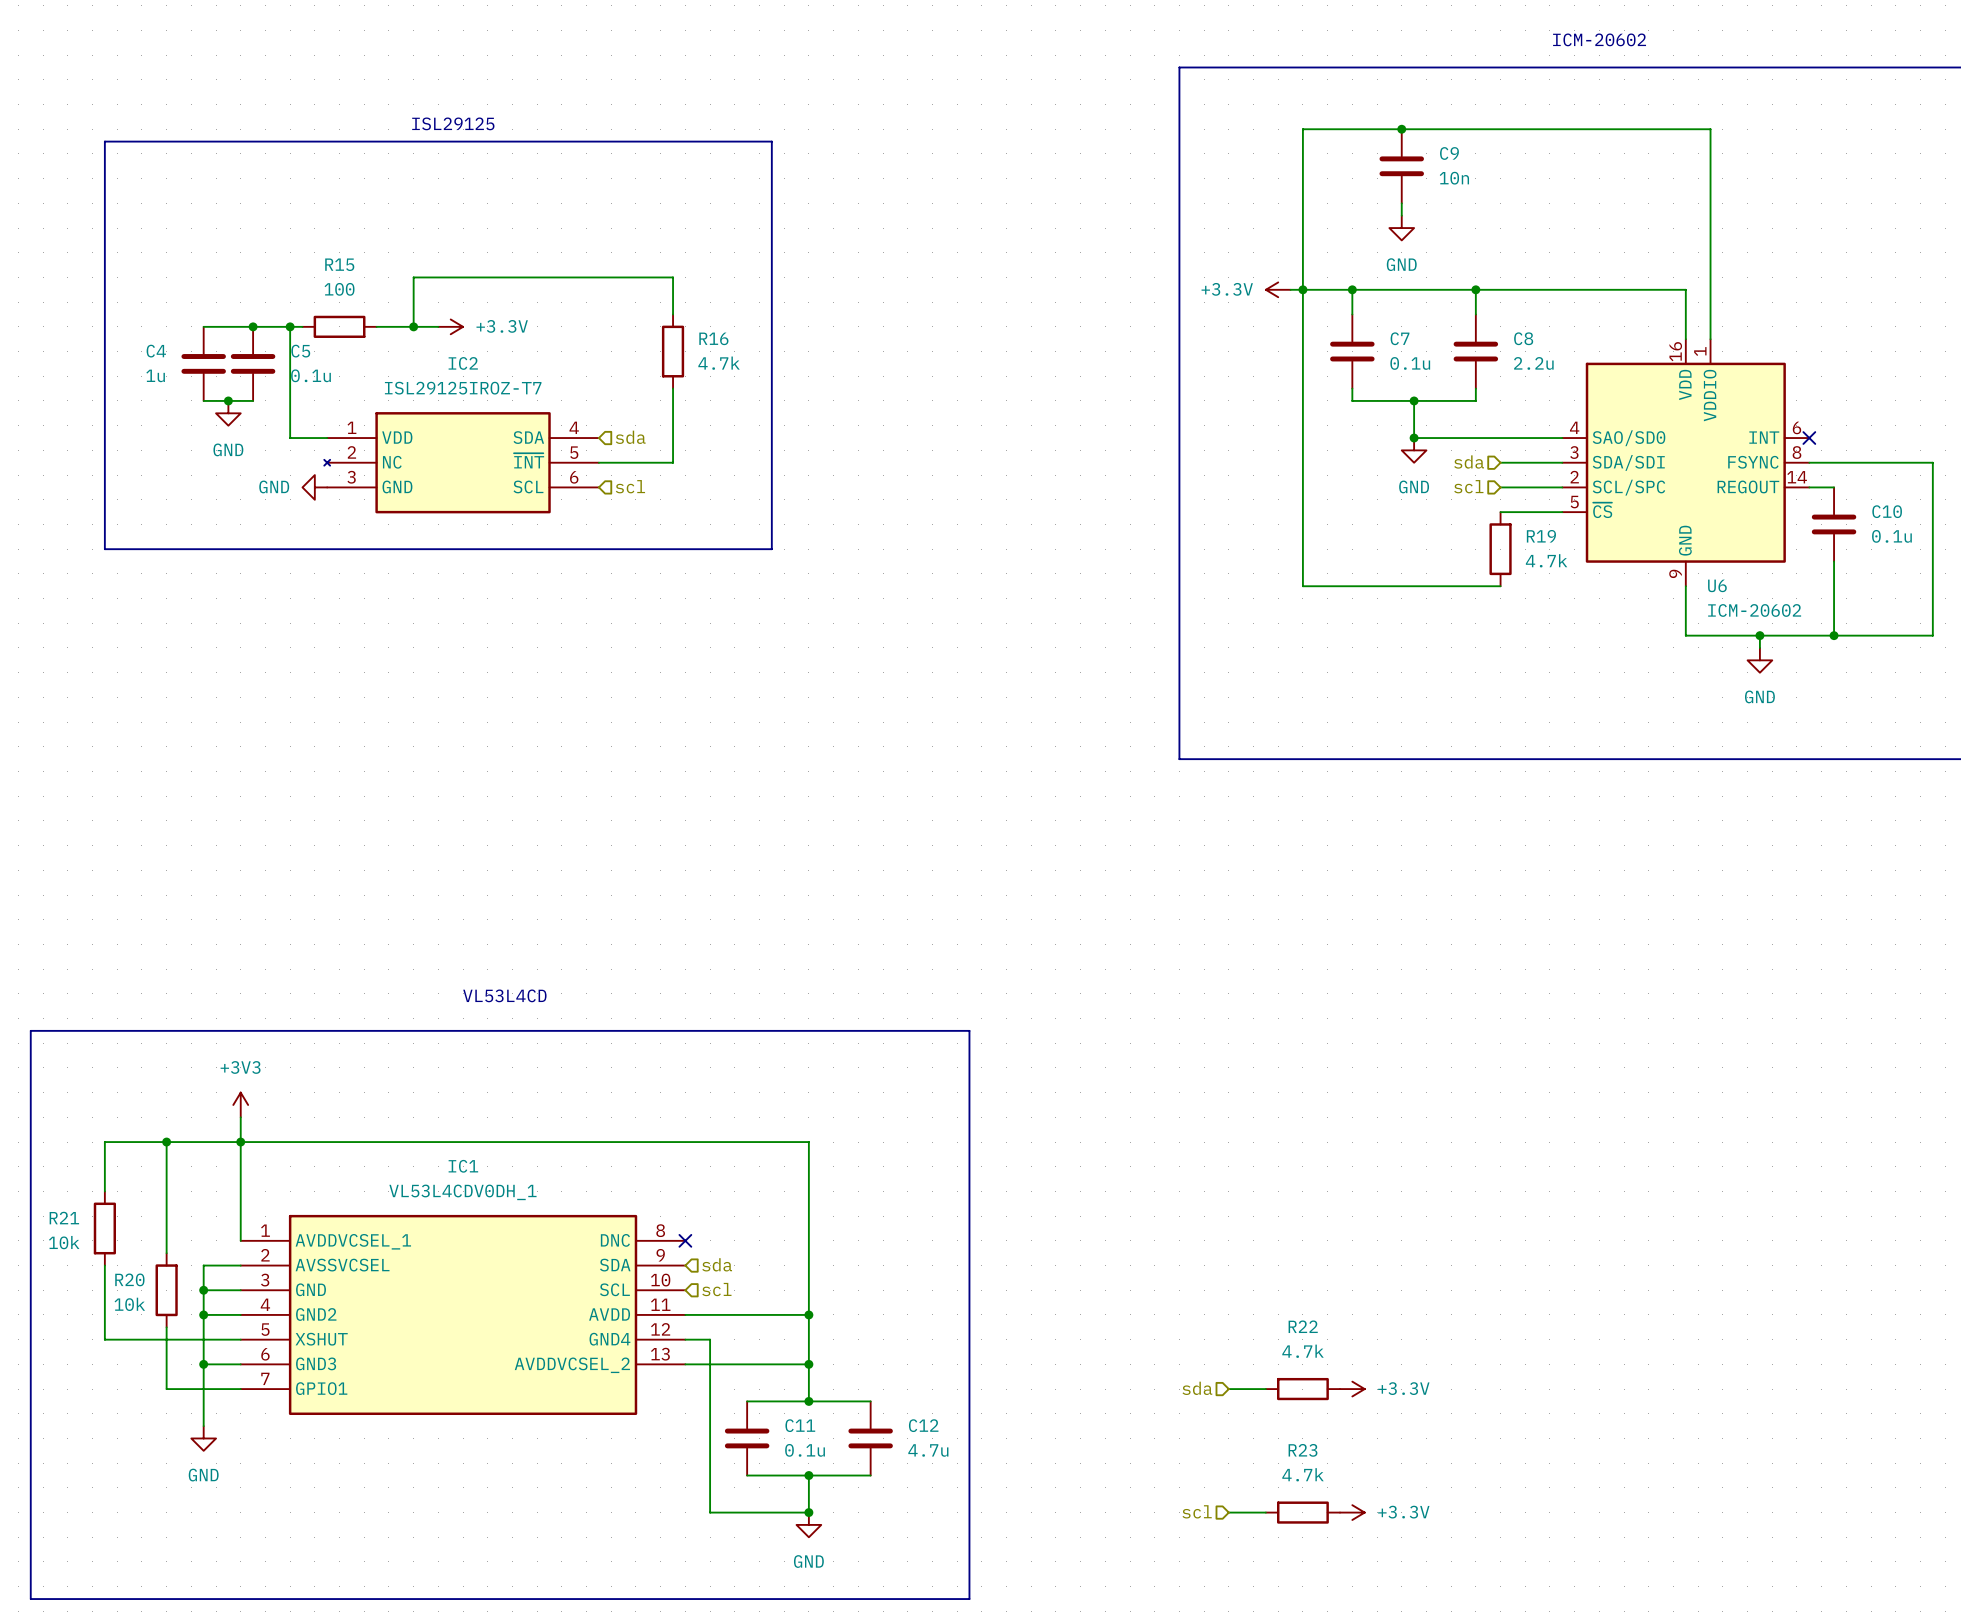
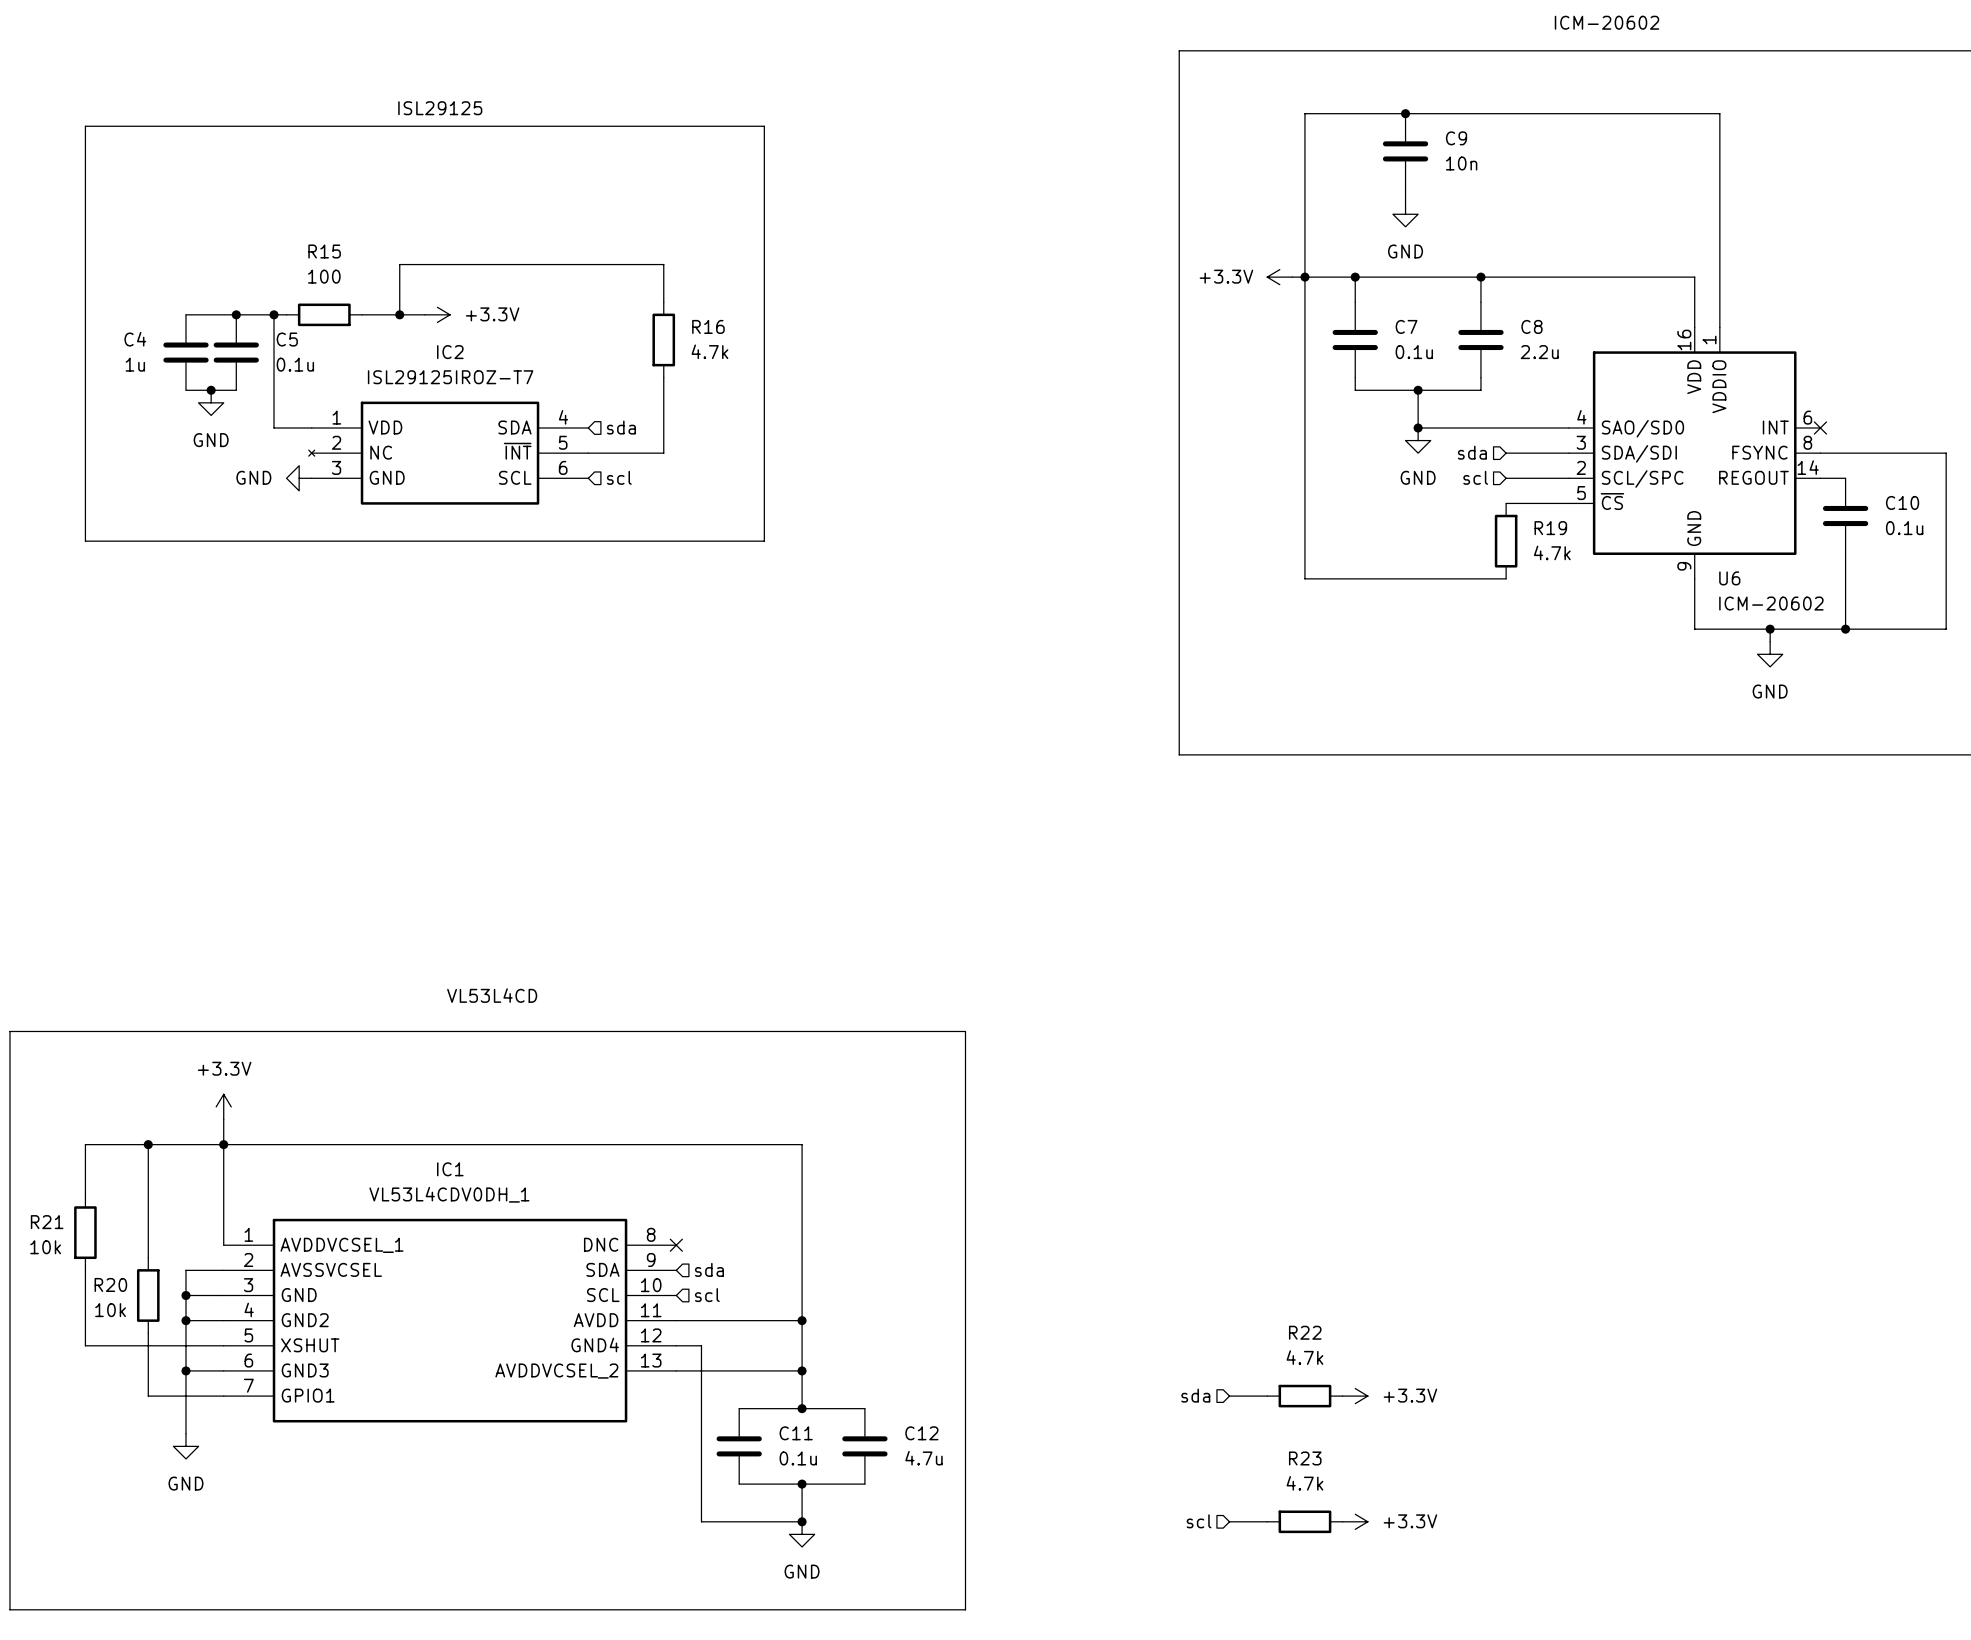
power symbol: +3V3 (240, 1104) -> +3.3V (223, 1106)

